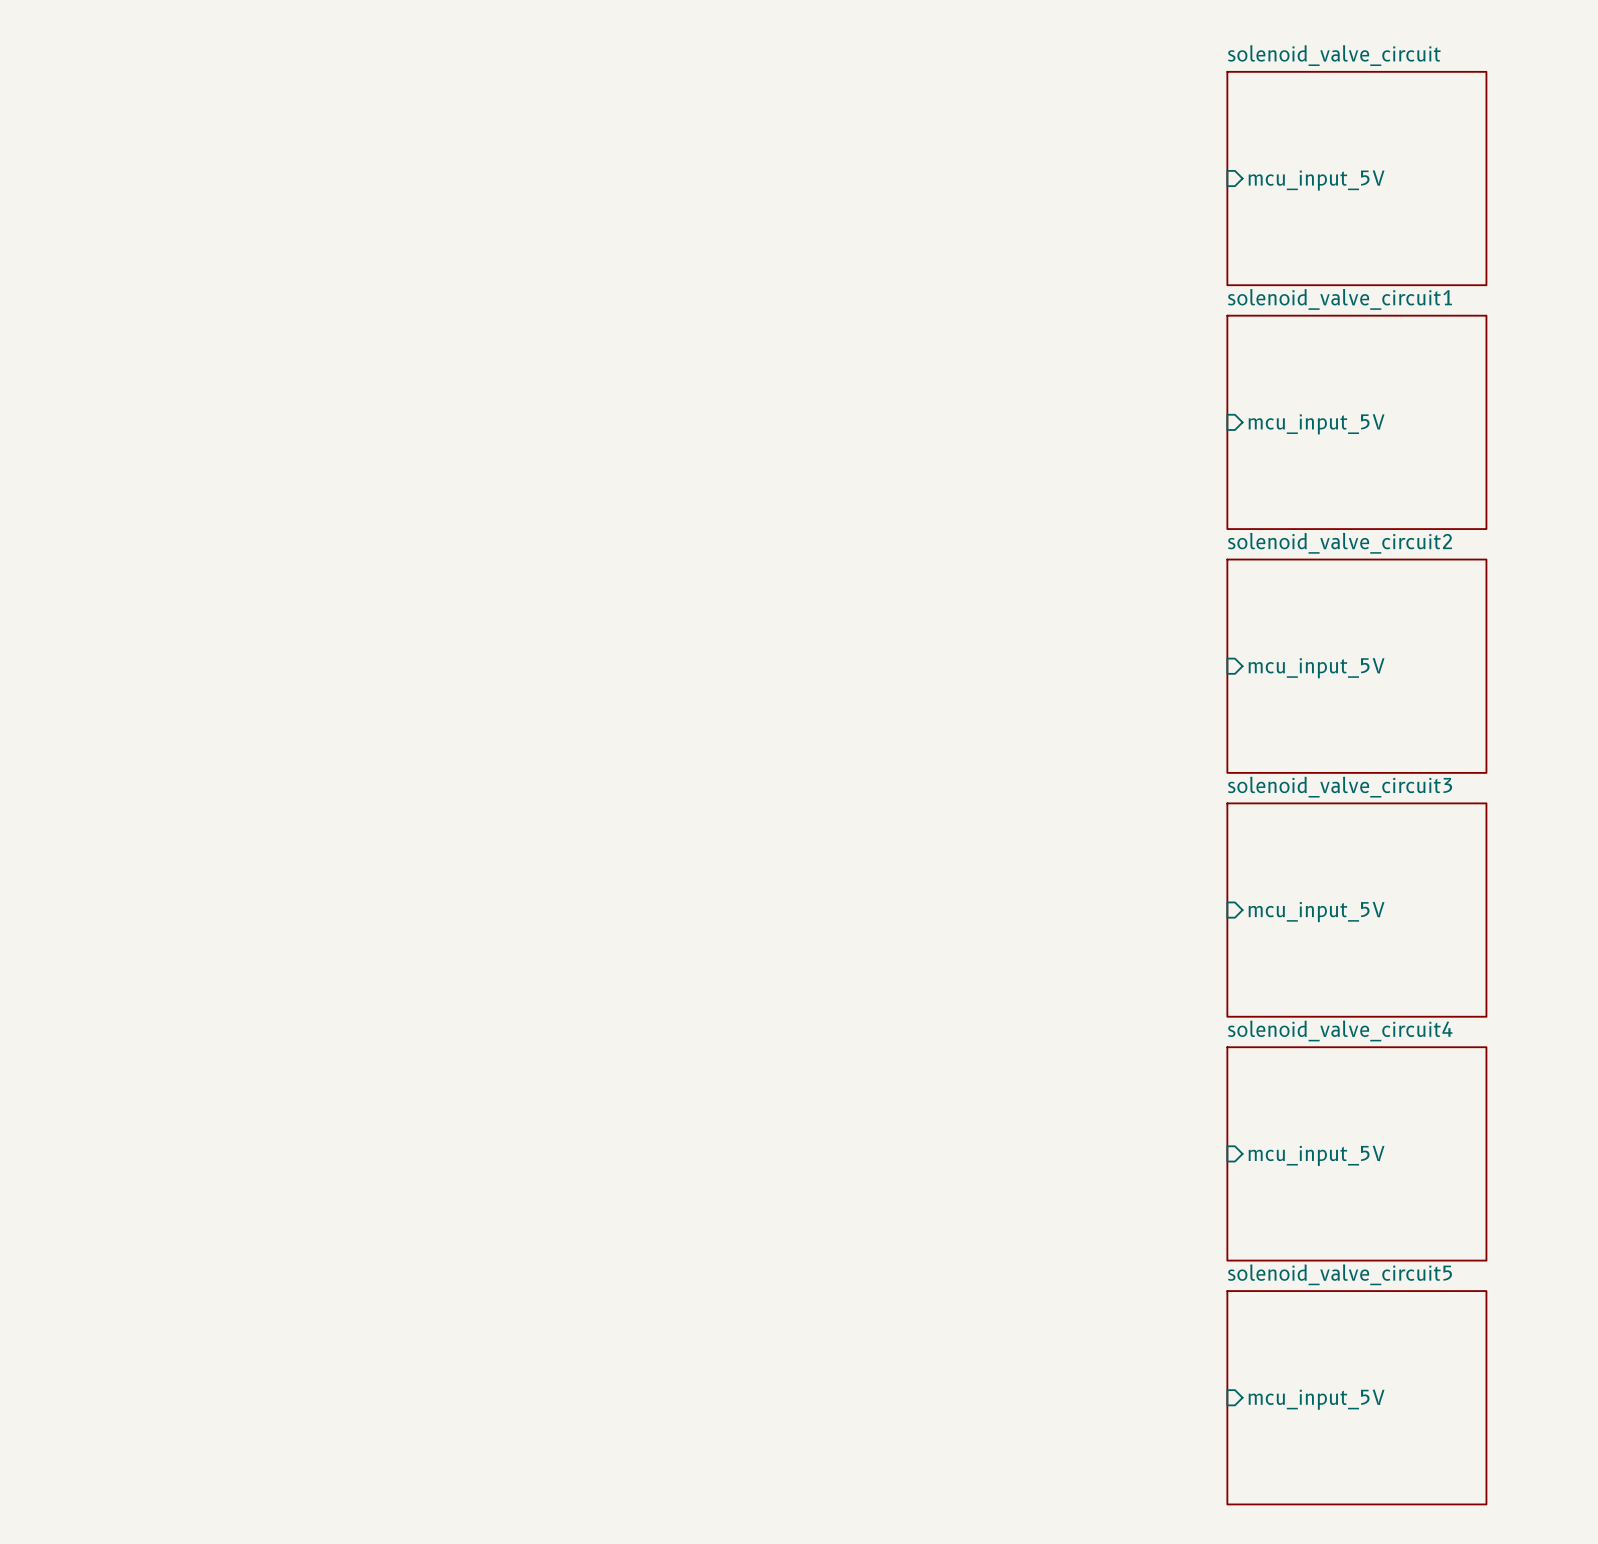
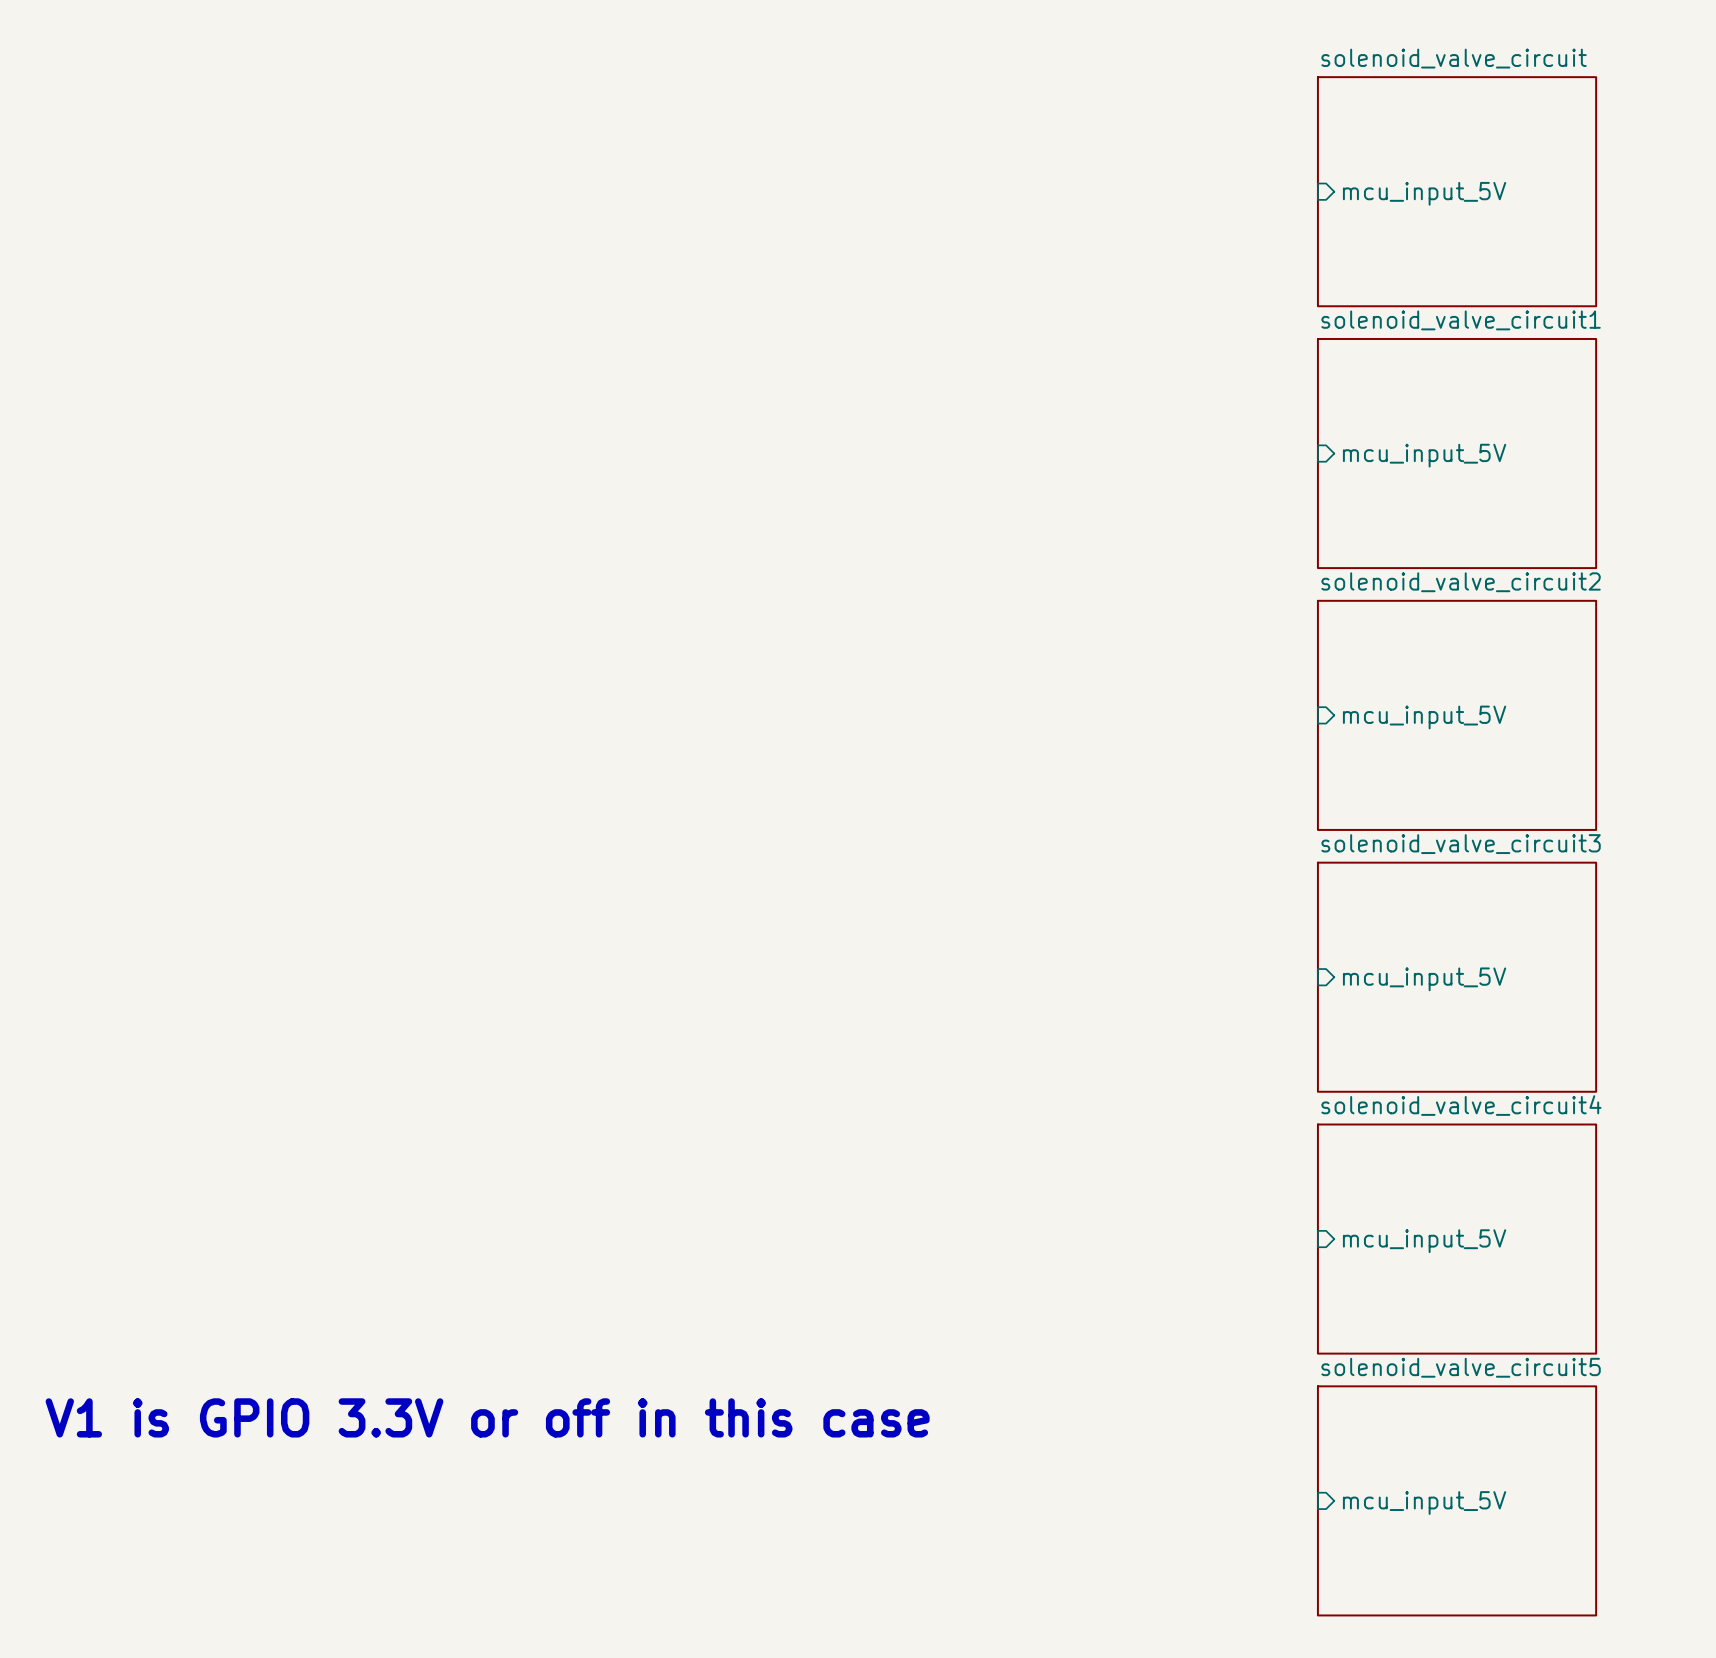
text: none -> V1 is GPIO 3.3V or off in this case (487, 1417)

